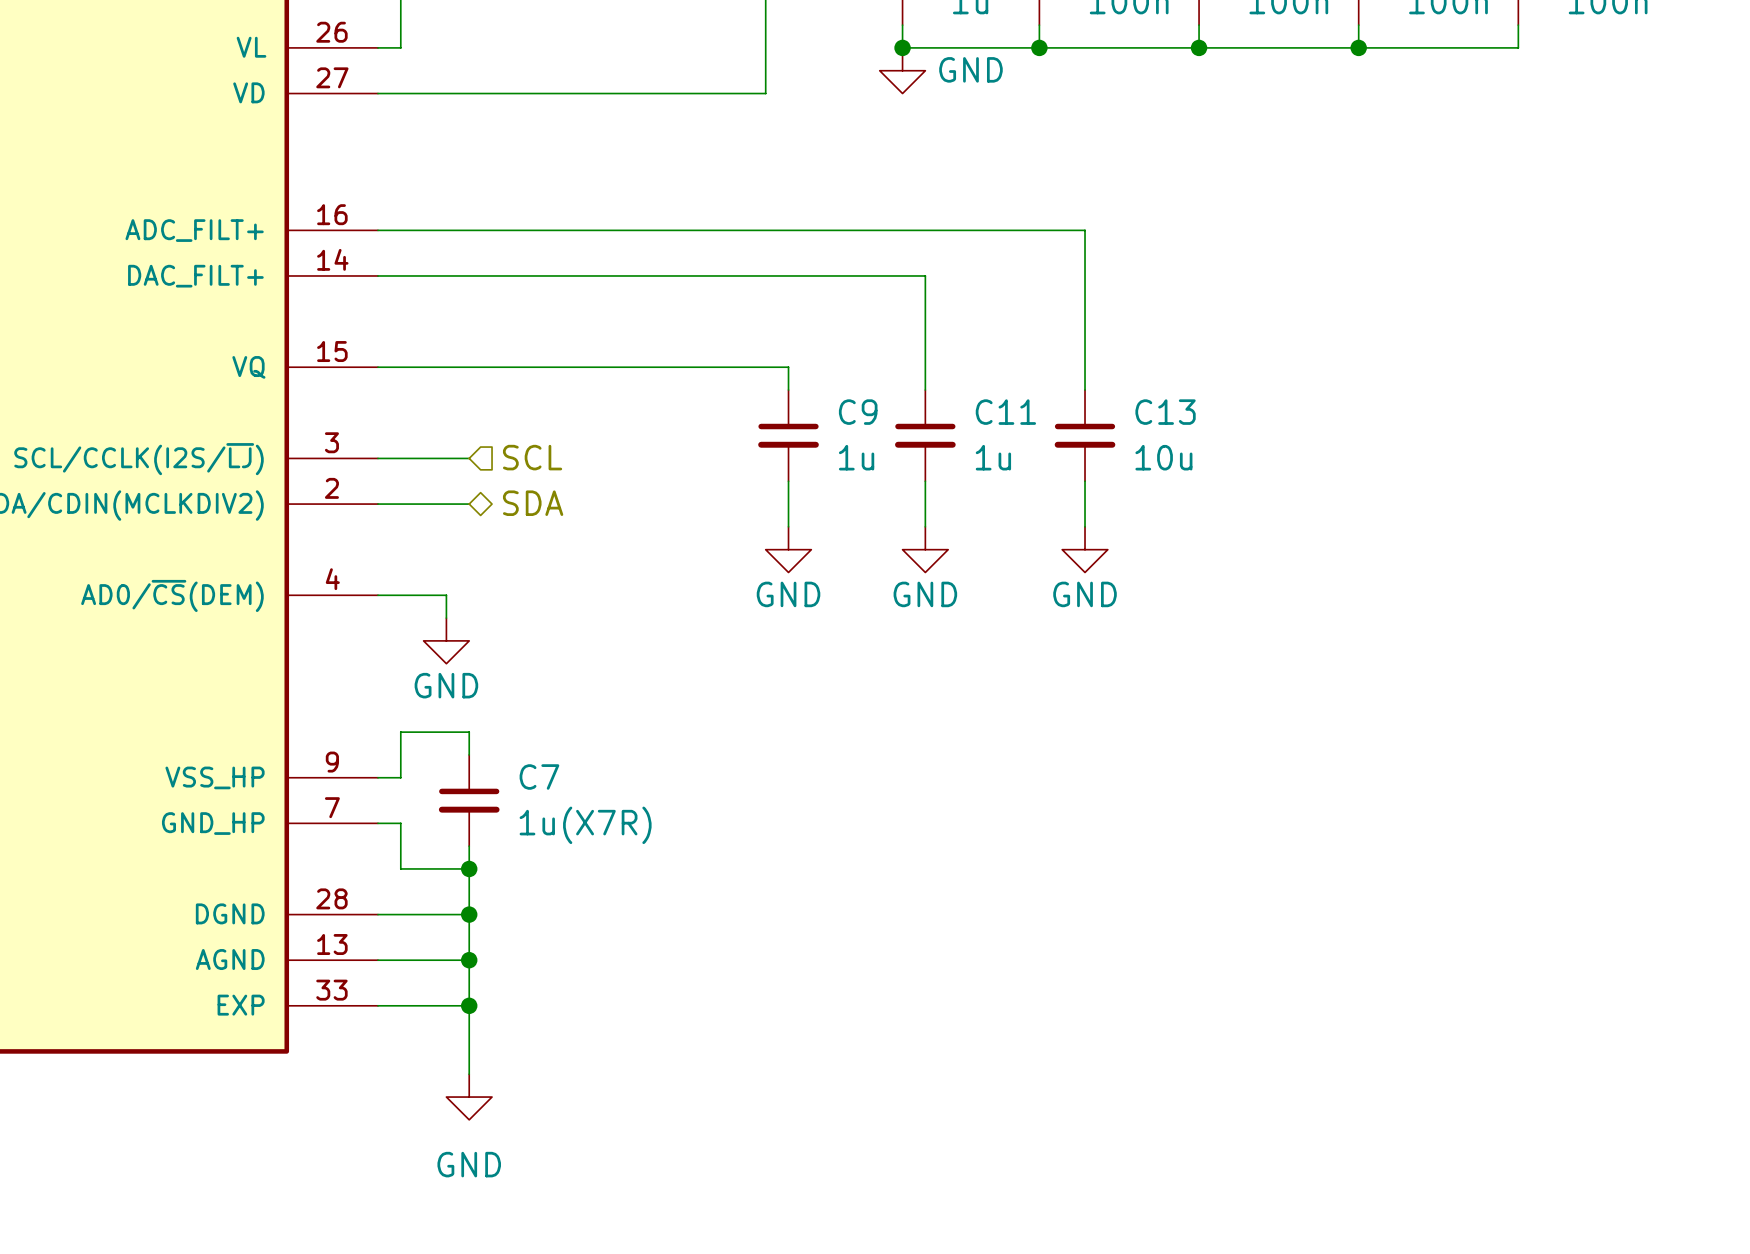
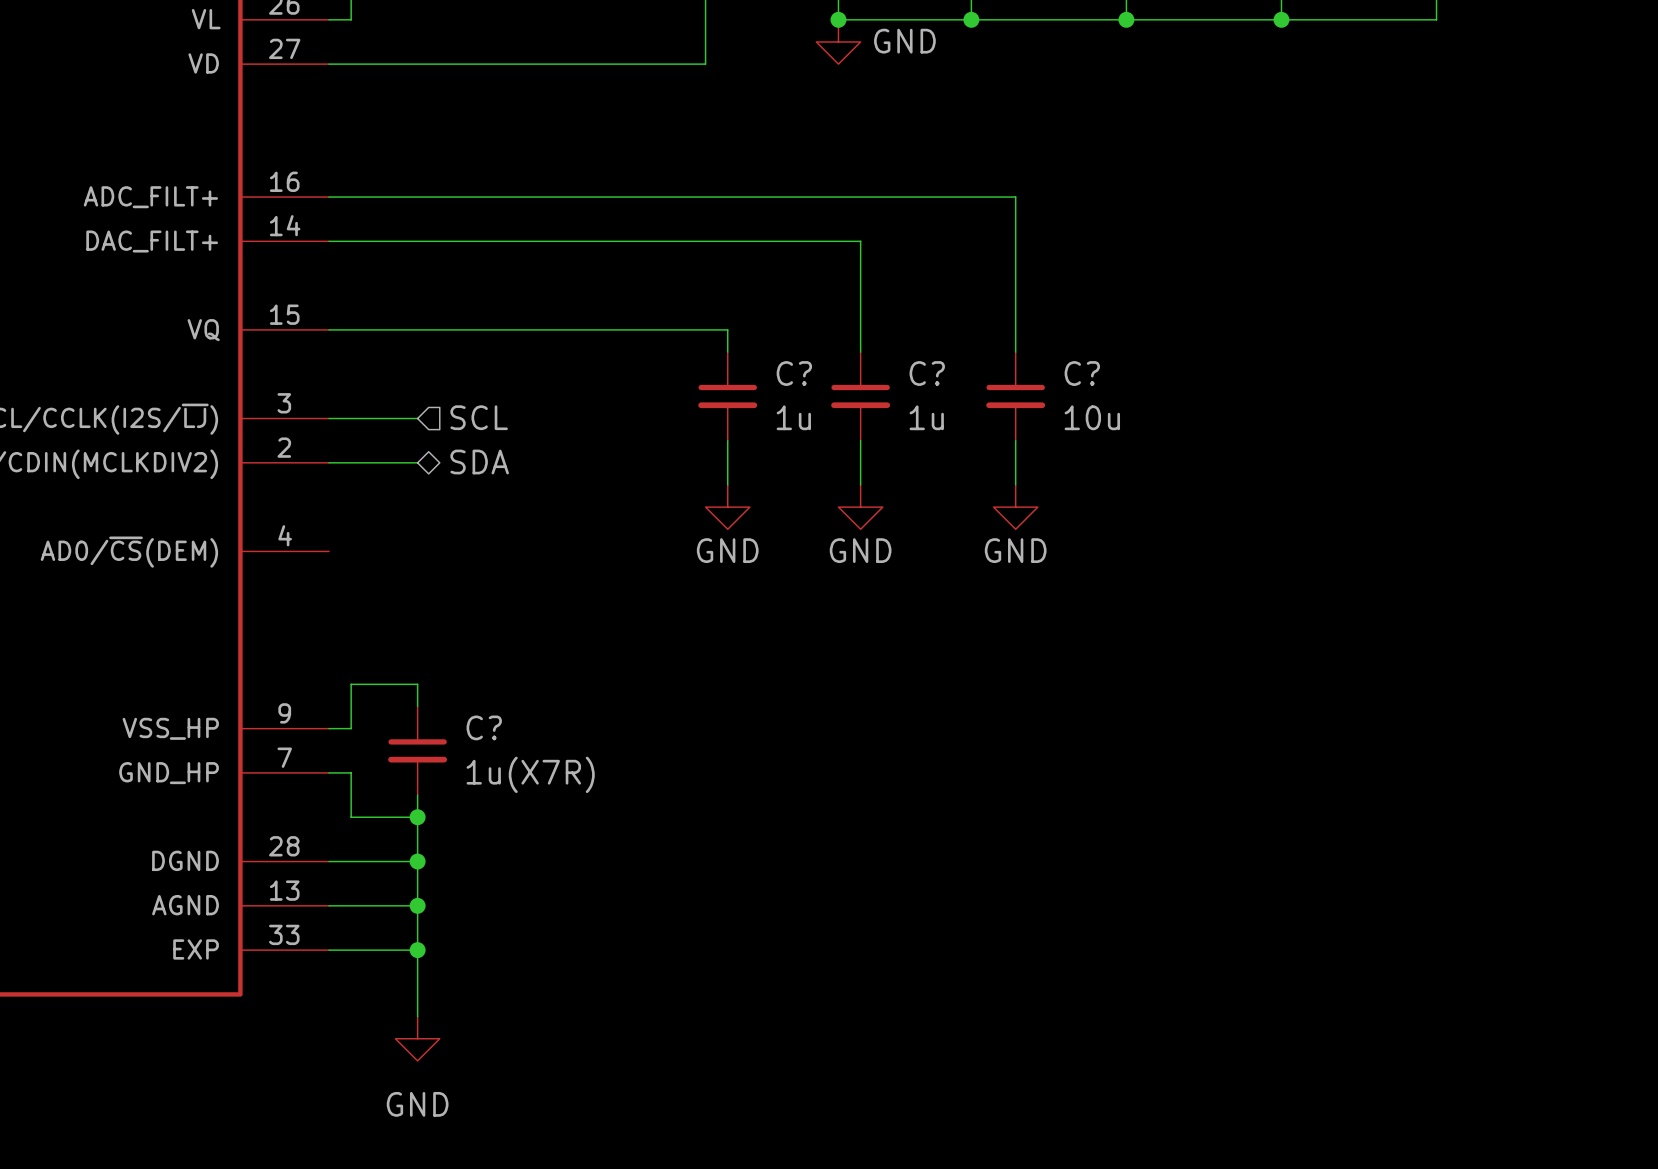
C9 name: C9 (858, 412) -> C? (794, 373)
C11 name: C11 (1005, 412) -> C? (927, 373)
C13 name: C13 (1165, 412) -> C? (1082, 373)
wire: (377, 595) (446, 595) (446, 618) -> none
power symbol: GND (446, 640) -> none
C7 name: C7 (539, 777) -> C? (484, 727)

